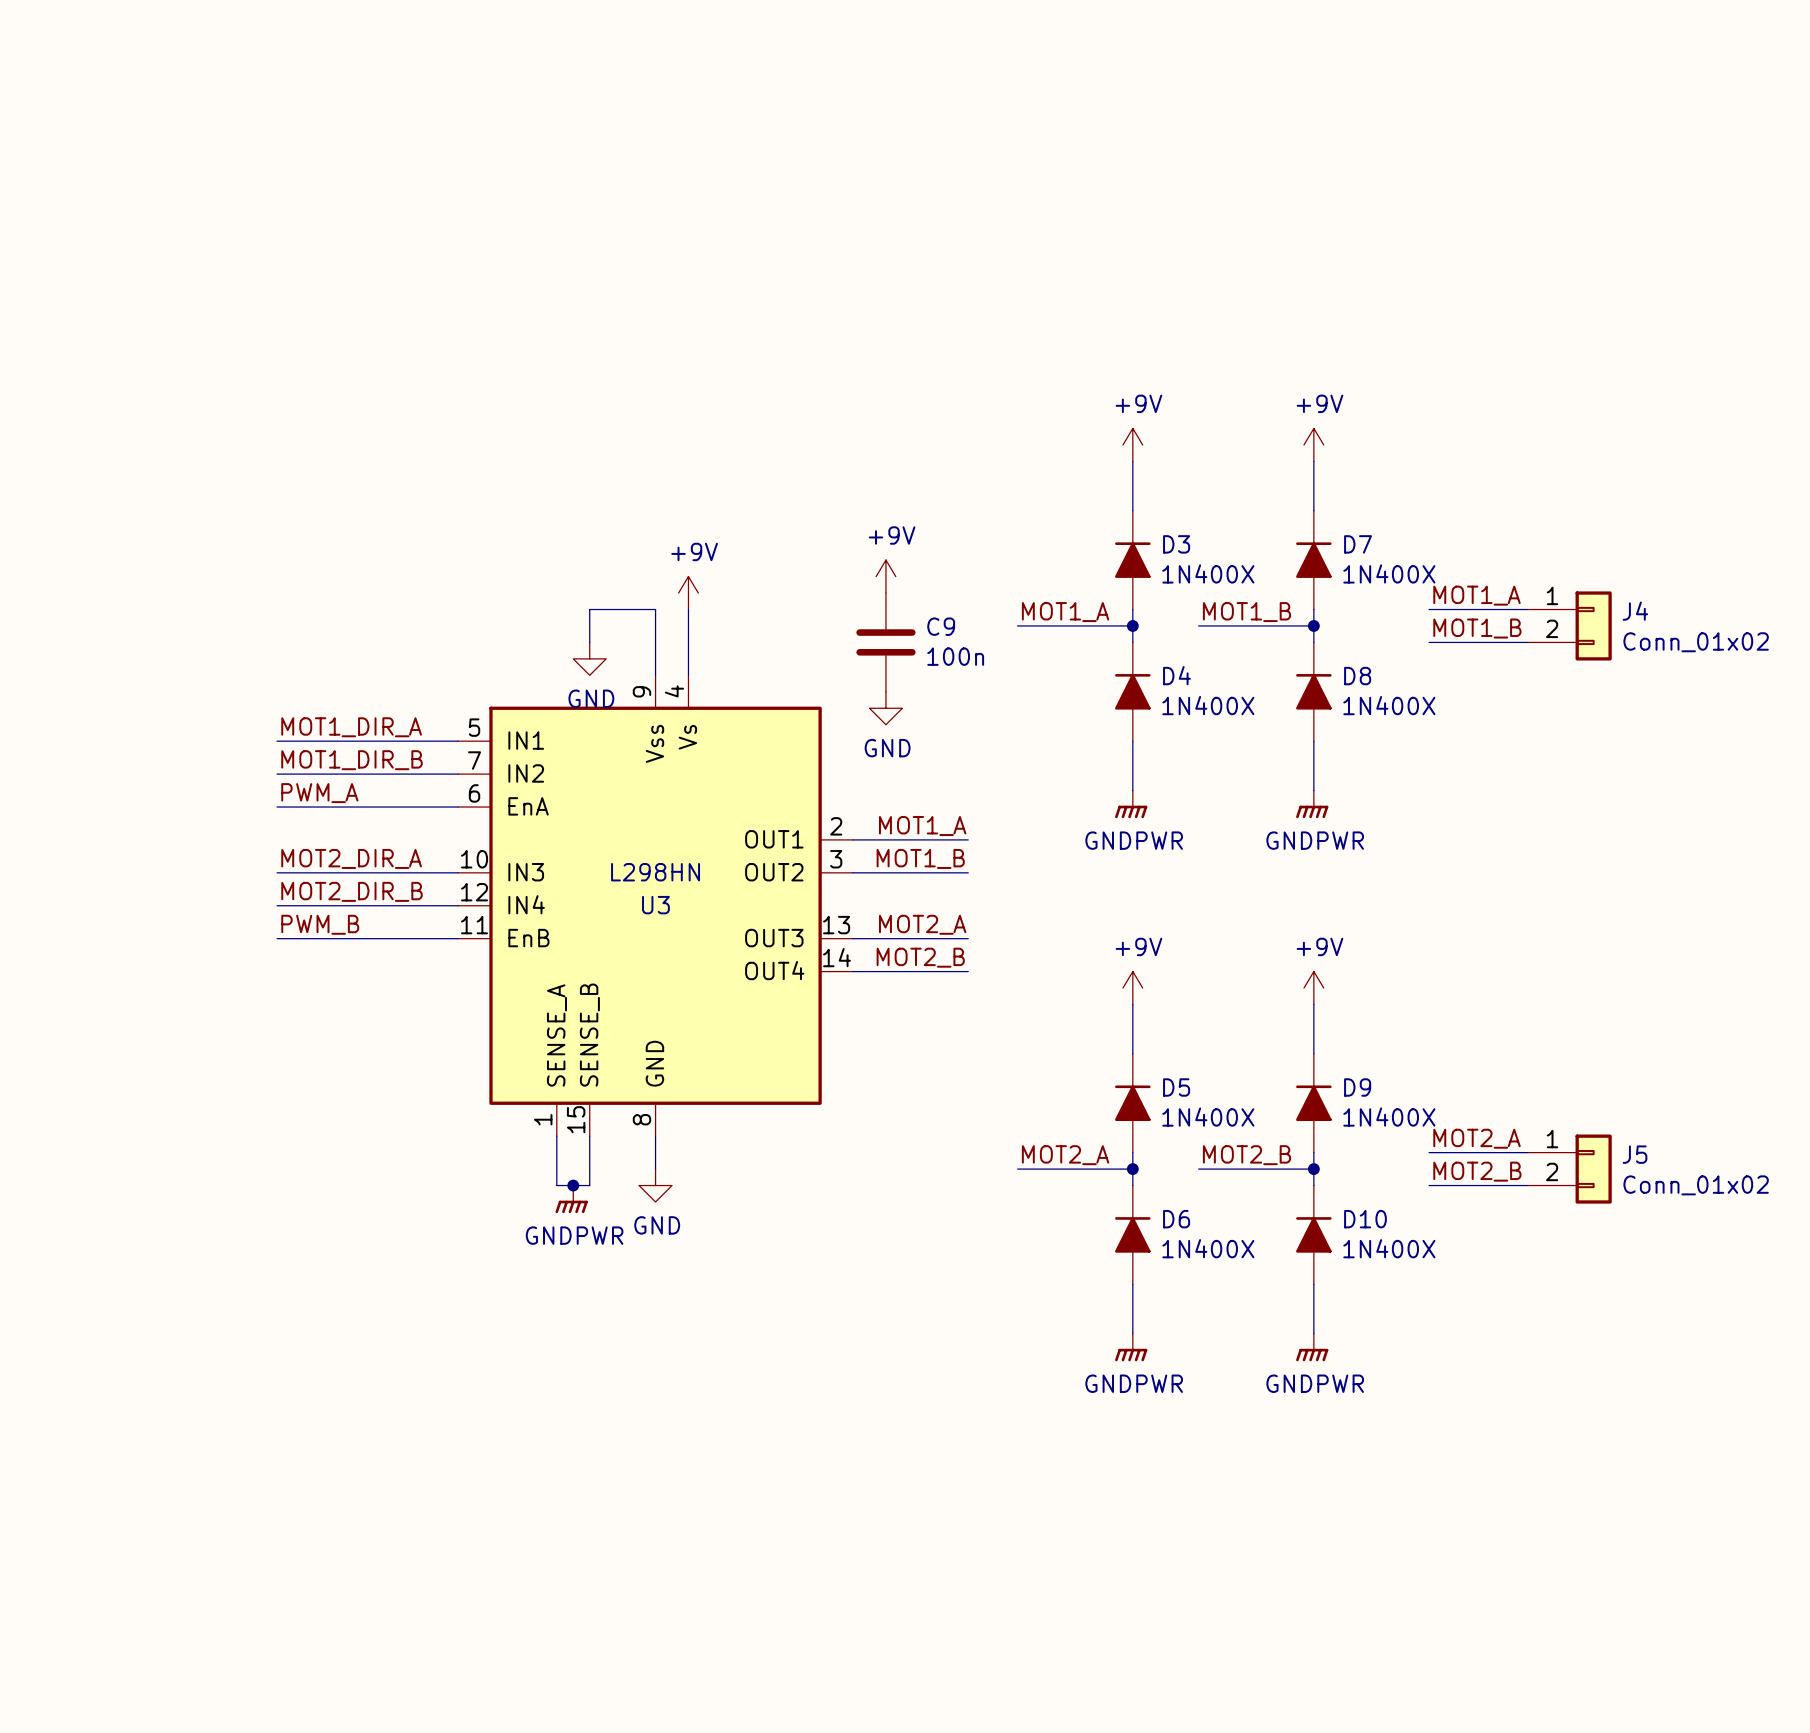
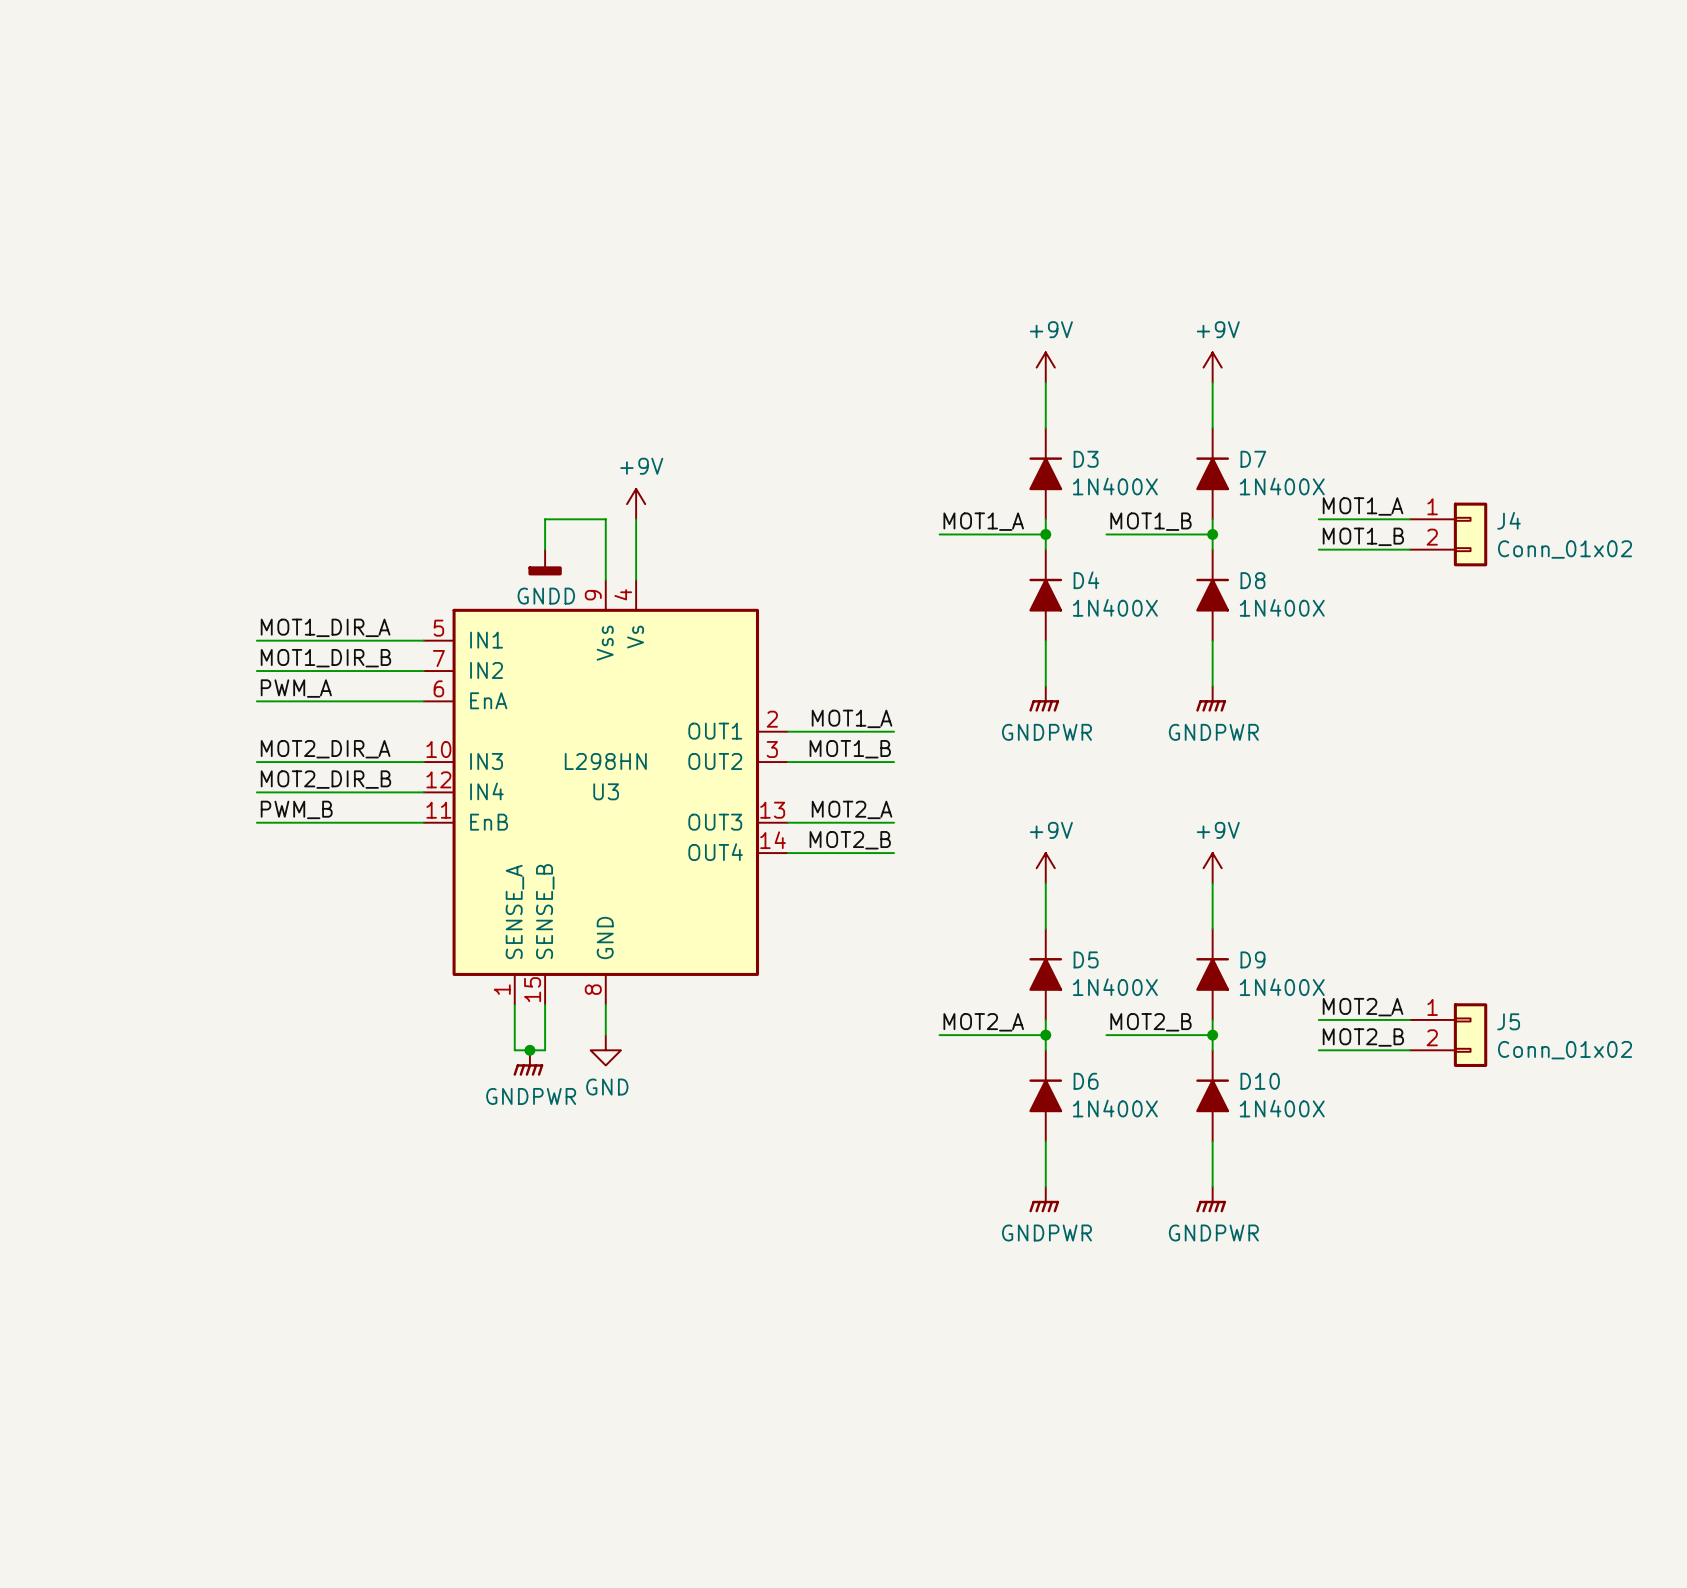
power symbol: +9V (885, 576) -> none
C9: 100n (885, 642) -> none
power symbol: GND (589, 658) -> GNDD (545, 562)
power symbol: GND (885, 708) -> none

